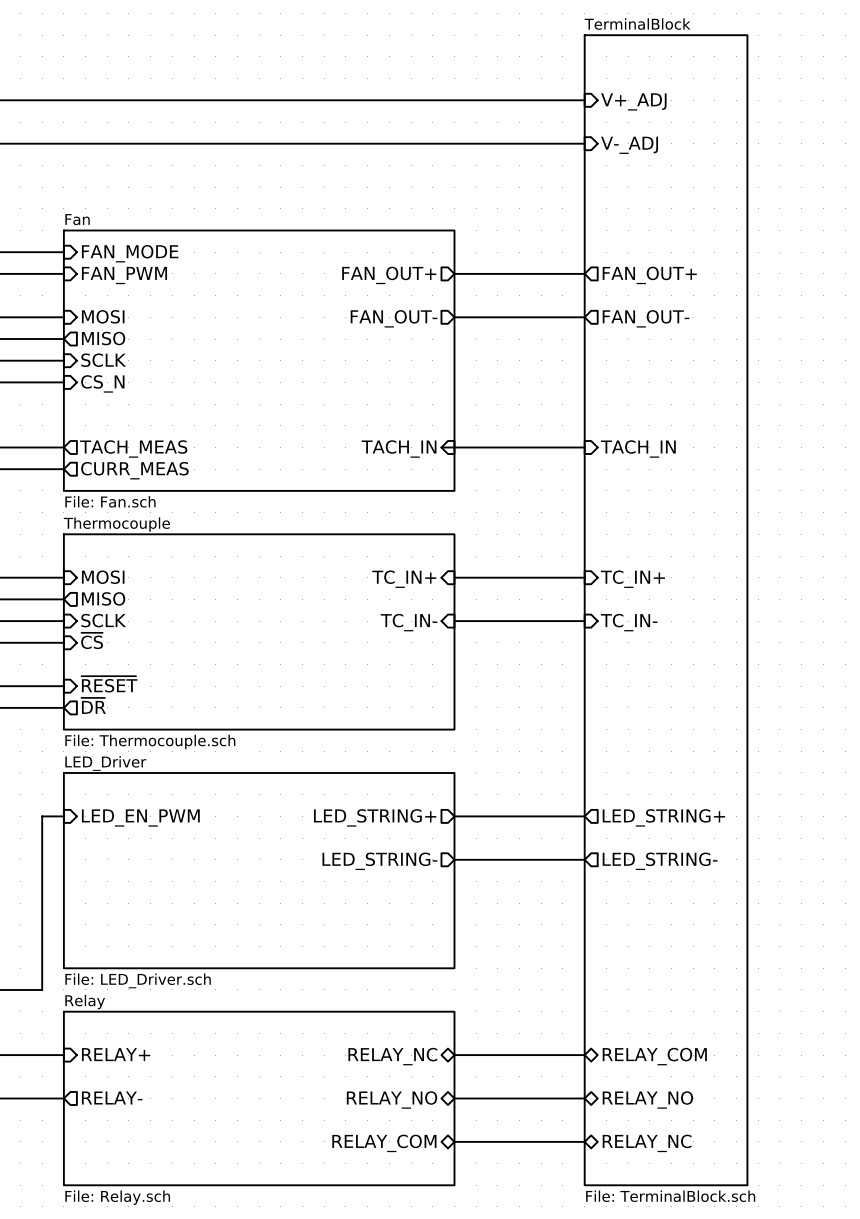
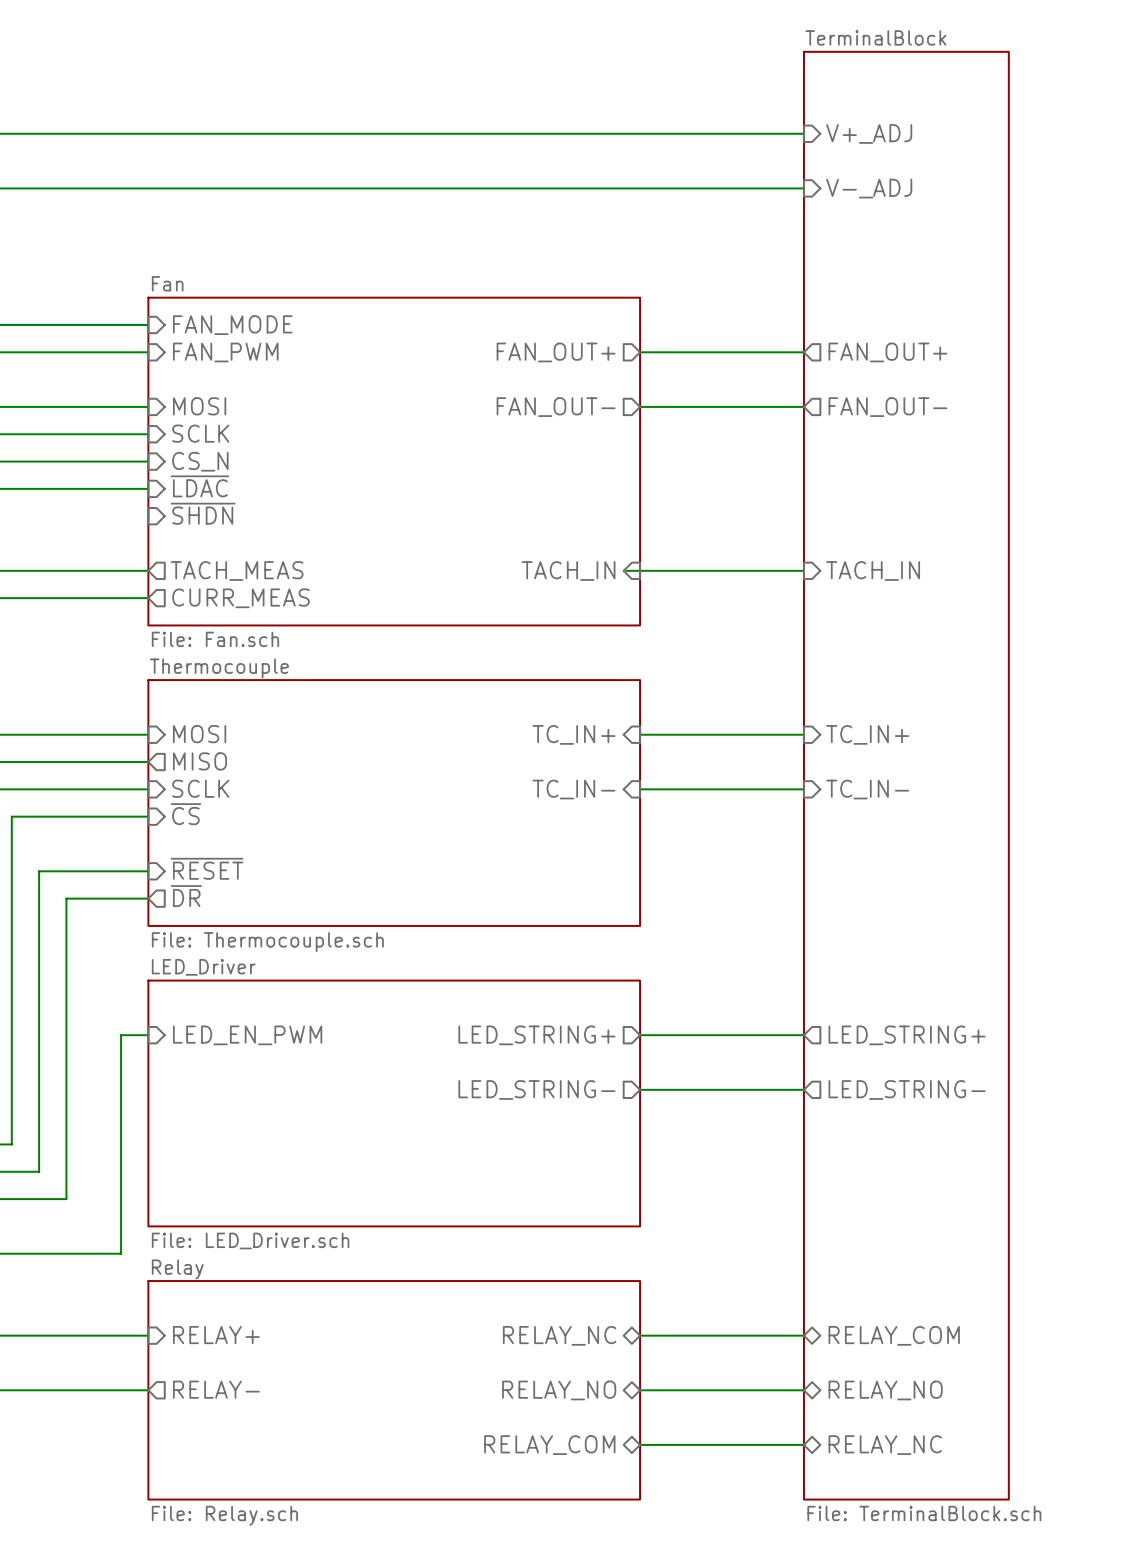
sheet pin shape: output (103, 338) -> input (200, 433)
sheet pin: MISO (103, 338) -> SCLK (200, 433)
sheet pin: SCLK (103, 360) -> CS_N (200, 461)
sheet pin: CS_N (102, 383) -> ~{LDAC} (199, 486)
sheet pin: none -> ~{SHDN} (203, 513)

